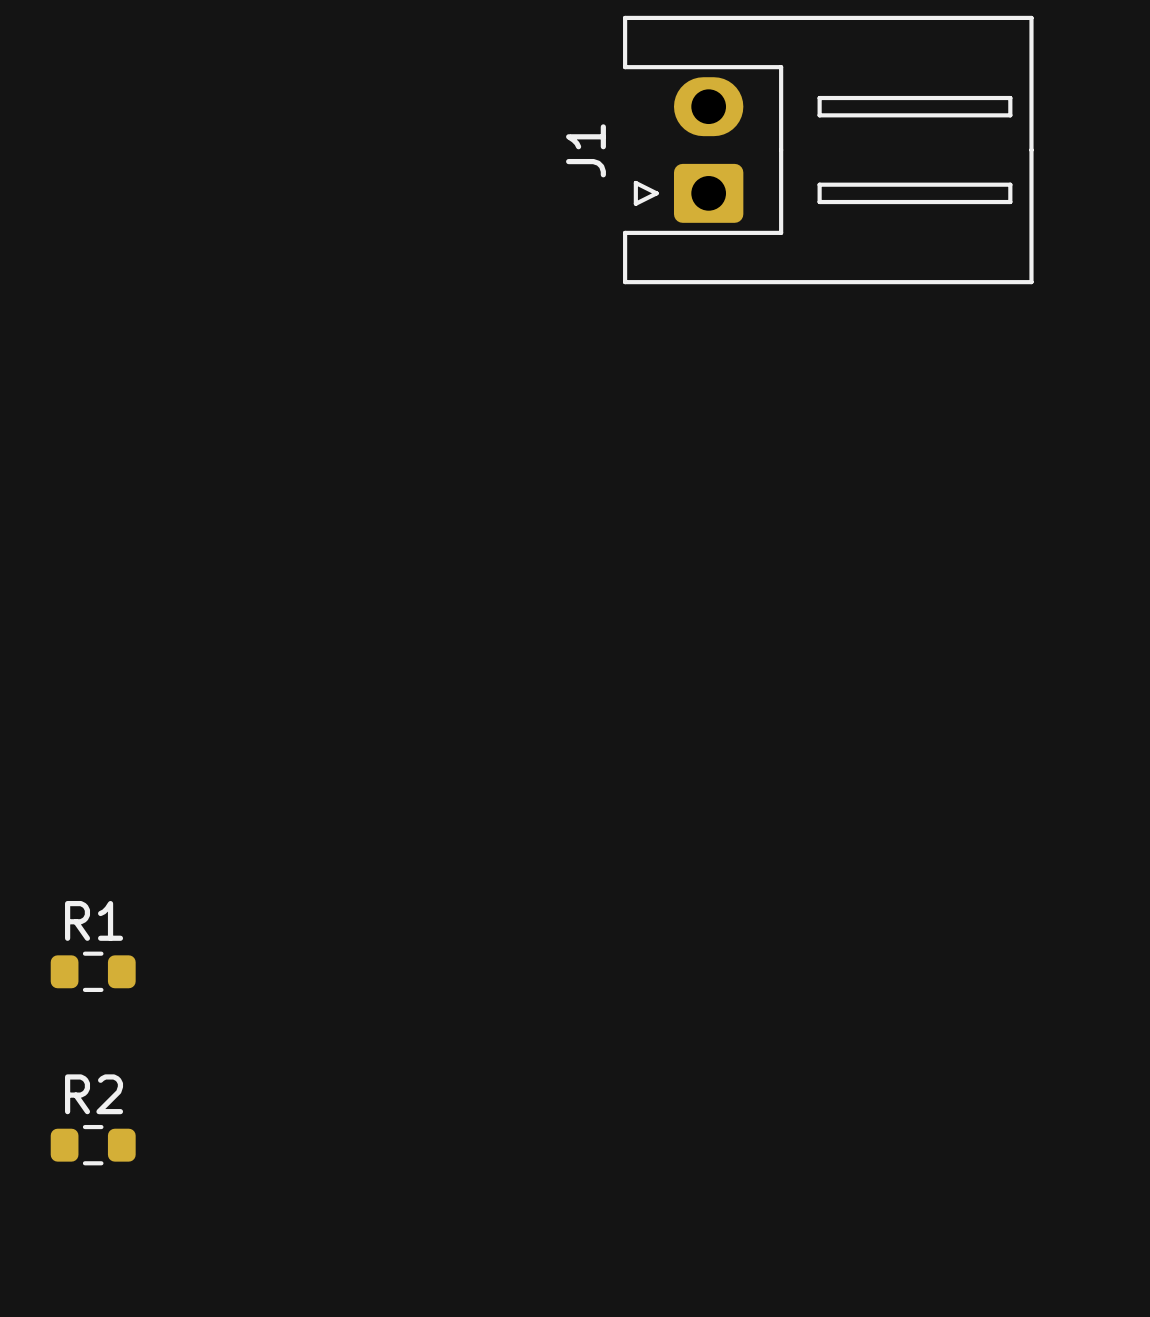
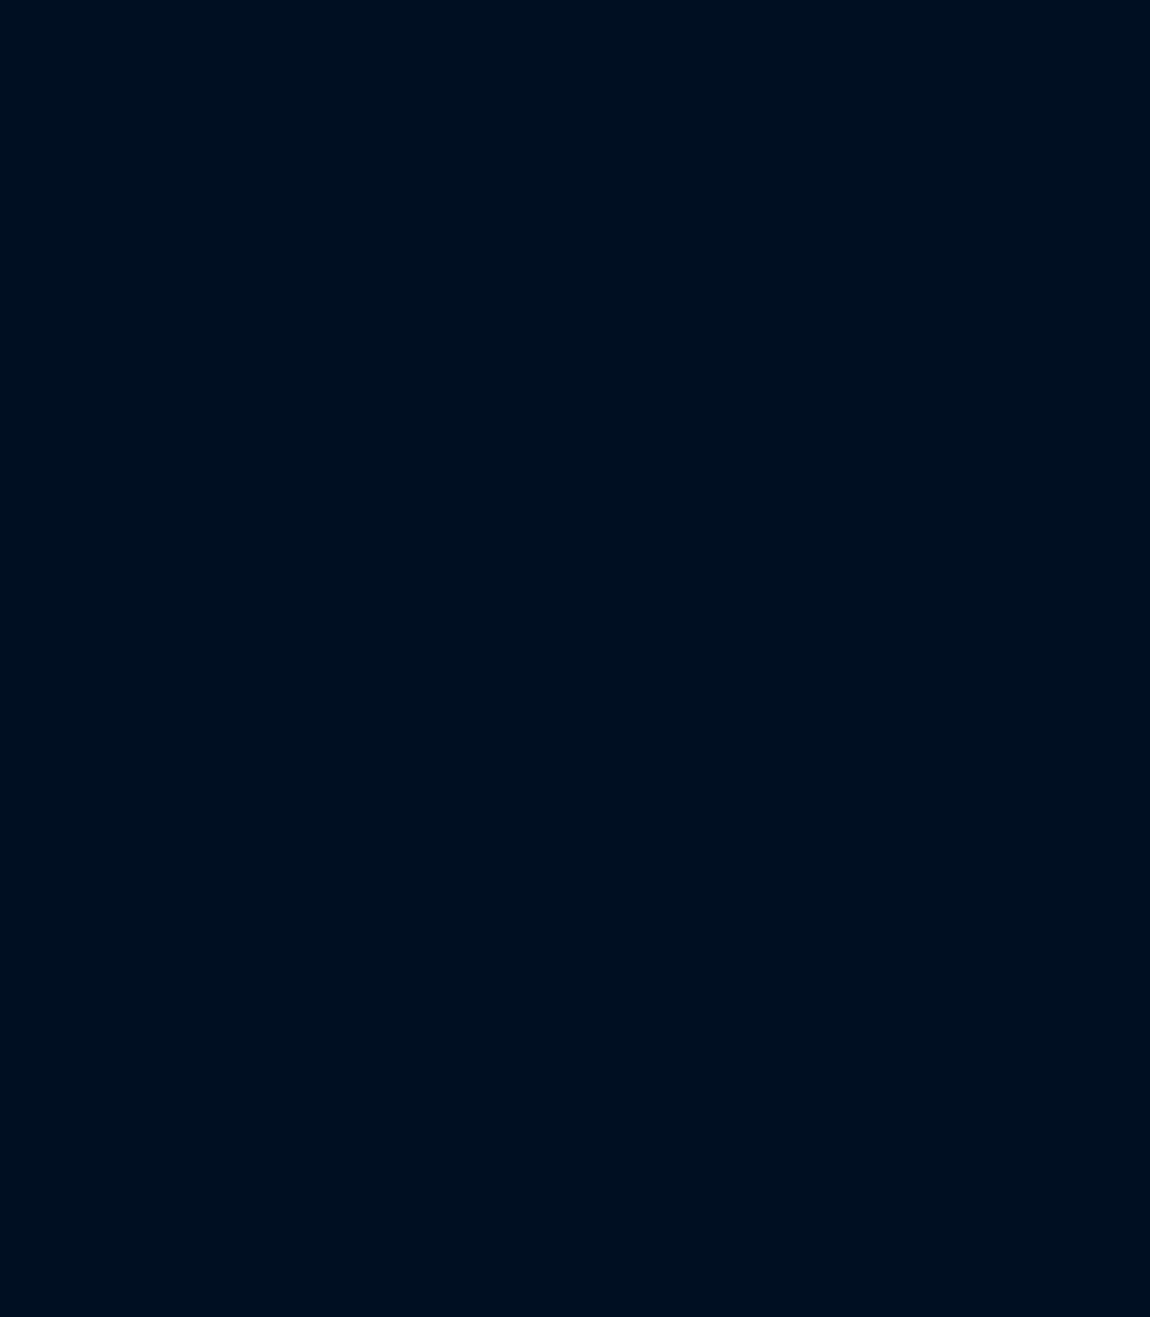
J1: (828, 150) -> none
R1: (93, 971) -> none
R2: (93, 1145) -> none

